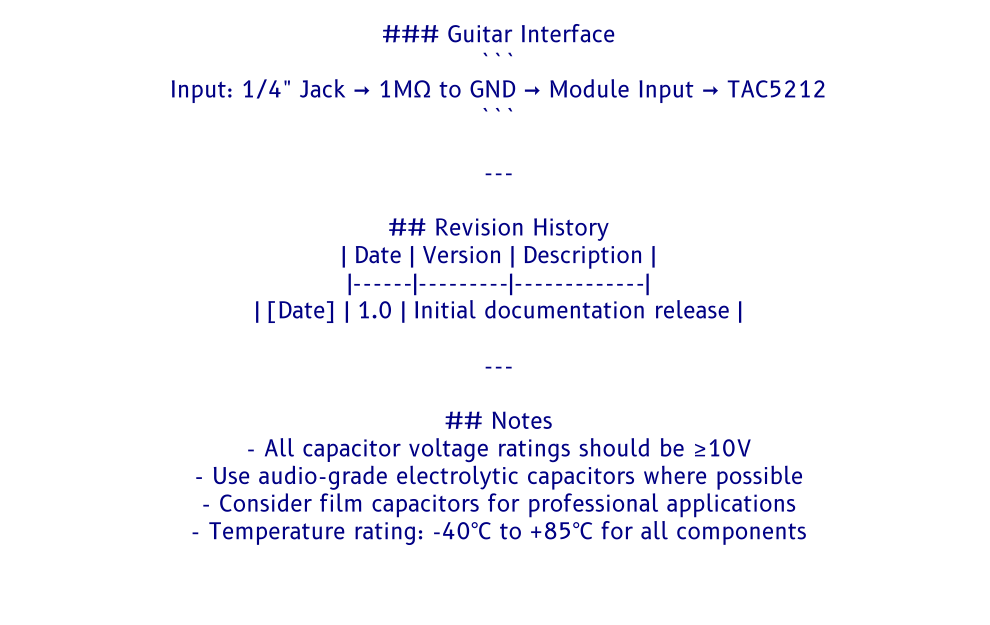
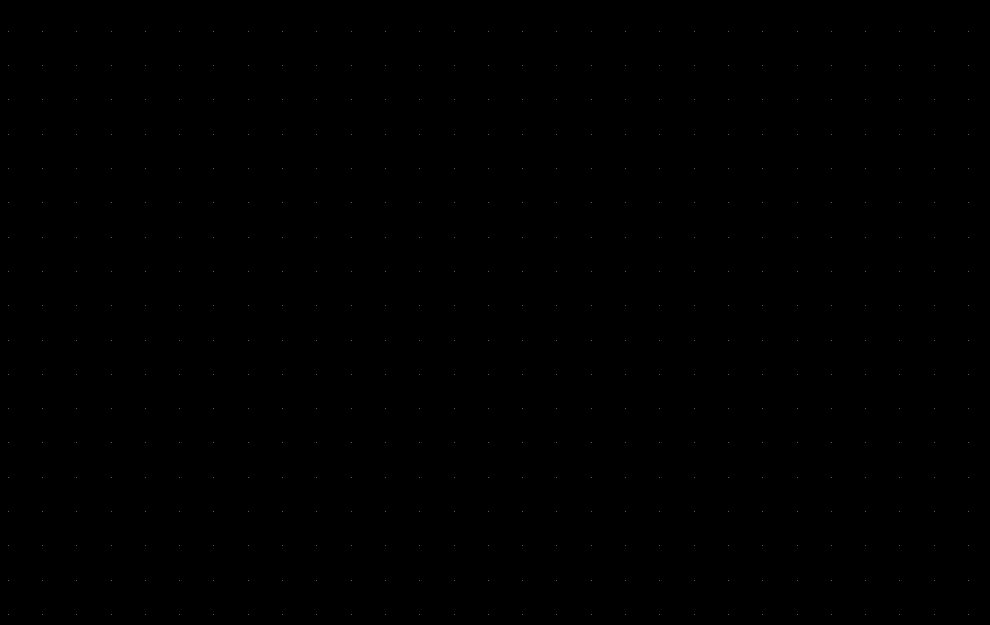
text: ### Guitar Interface (498, 33) -> none
text: ``` (497, 54) -> none
text: Input: 1/4" Jack → 1MΩ to GND → Module Input → TAC5212 (498, 91) -> none
text: ``` (497, 109) -> none
text: --- (498, 174) -> none
text: ## Revision History (498, 229) -> none
text: | Date | Version | Description | (498, 257) -> none
text: |------|---------|-------------| (498, 284) -> none
text: | [Date] | 1.0 | Initial documentation release | (498, 311) -> none
text: --- (498, 367) -> none
text: ## Notes (498, 420) -> none
text: - All capacitor voltage ratings should be ≥10V (499, 450) -> none
text: - Use audio-grade electrolytic capacitors where possible (499, 477) -> none
text: - Consider film capacitors for professional applications (499, 505) -> none
text: - Temperature rating: -40°C to +85°C for all components (499, 532) -> none

